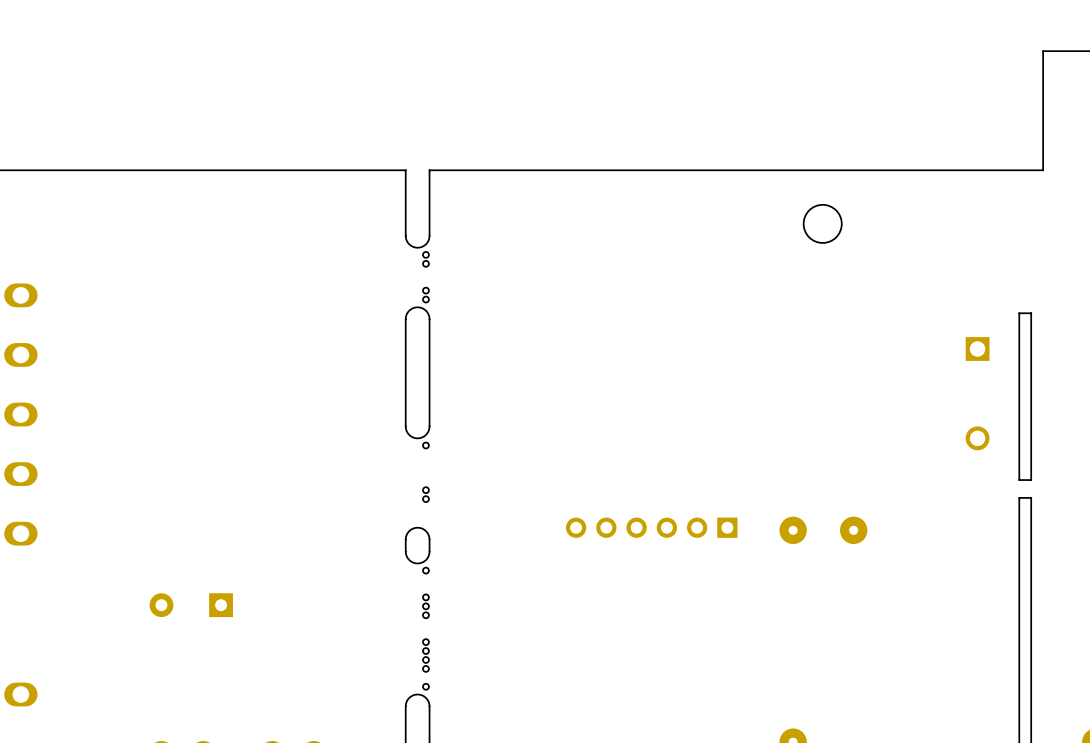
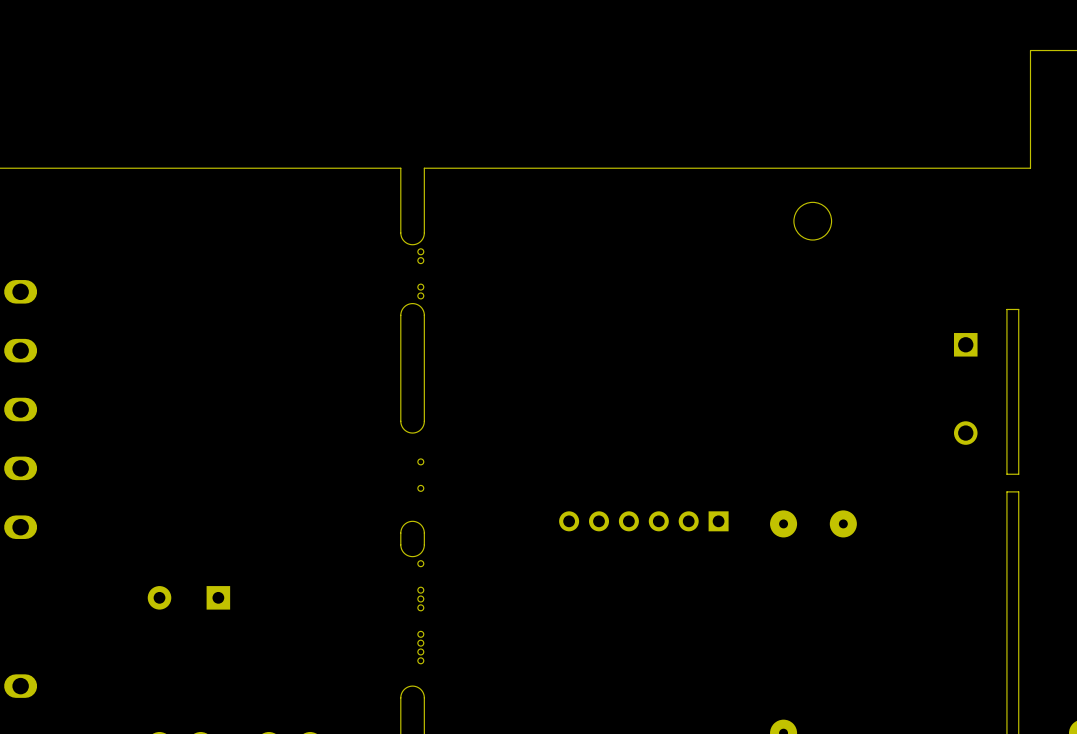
part: (425, 445) -> none
part: none -> (420, 461)
part: (425, 490) -> none
part: none -> (420, 488)
part: (425, 499) -> none
part: (425, 686) -> none

